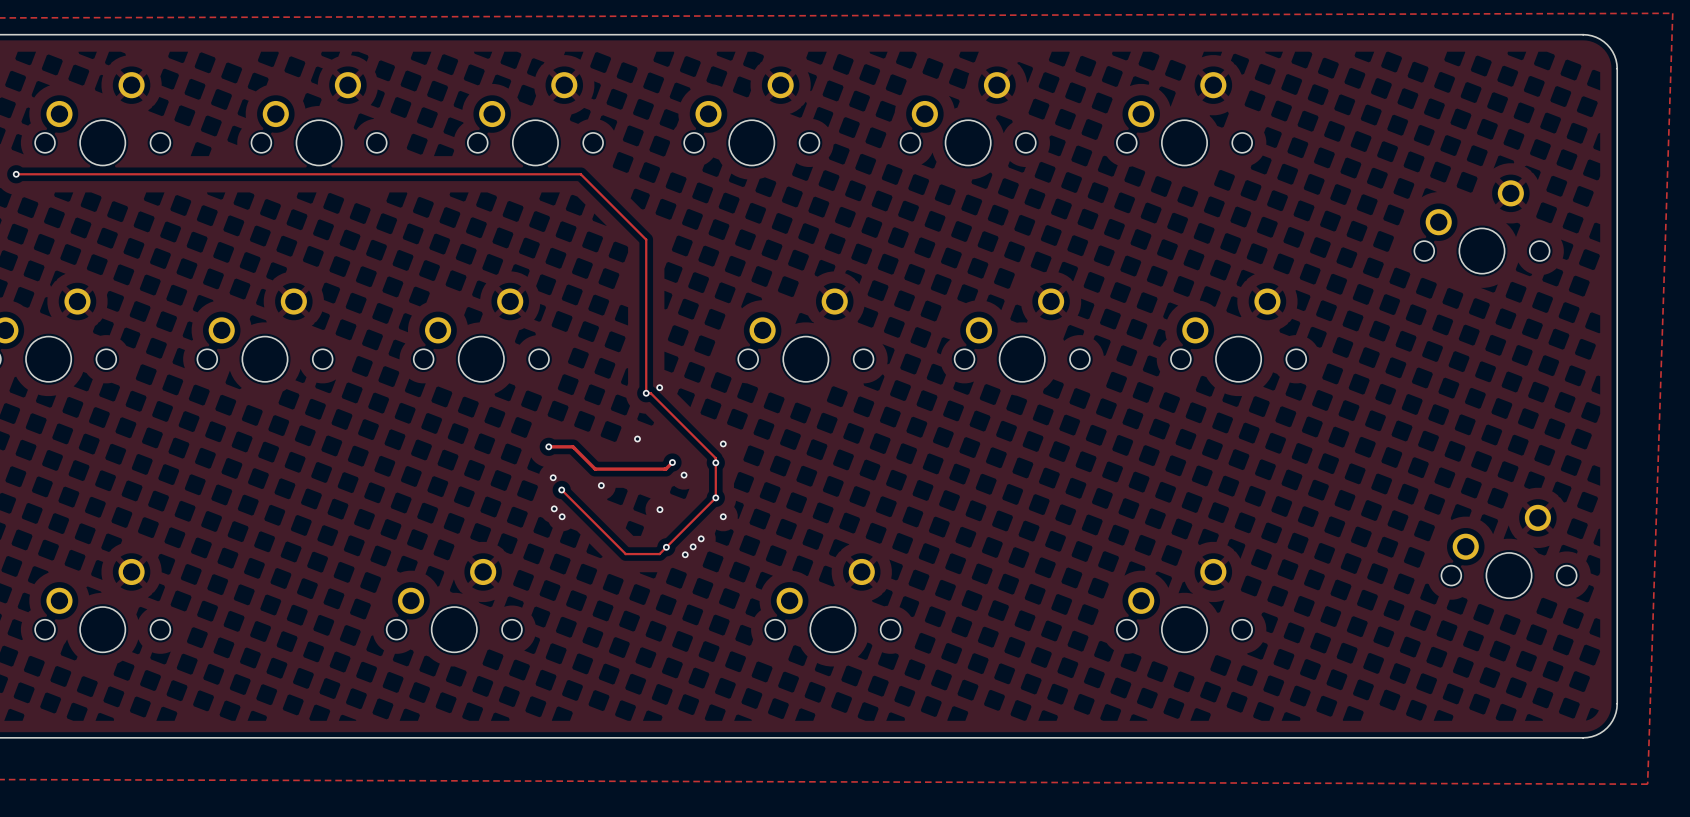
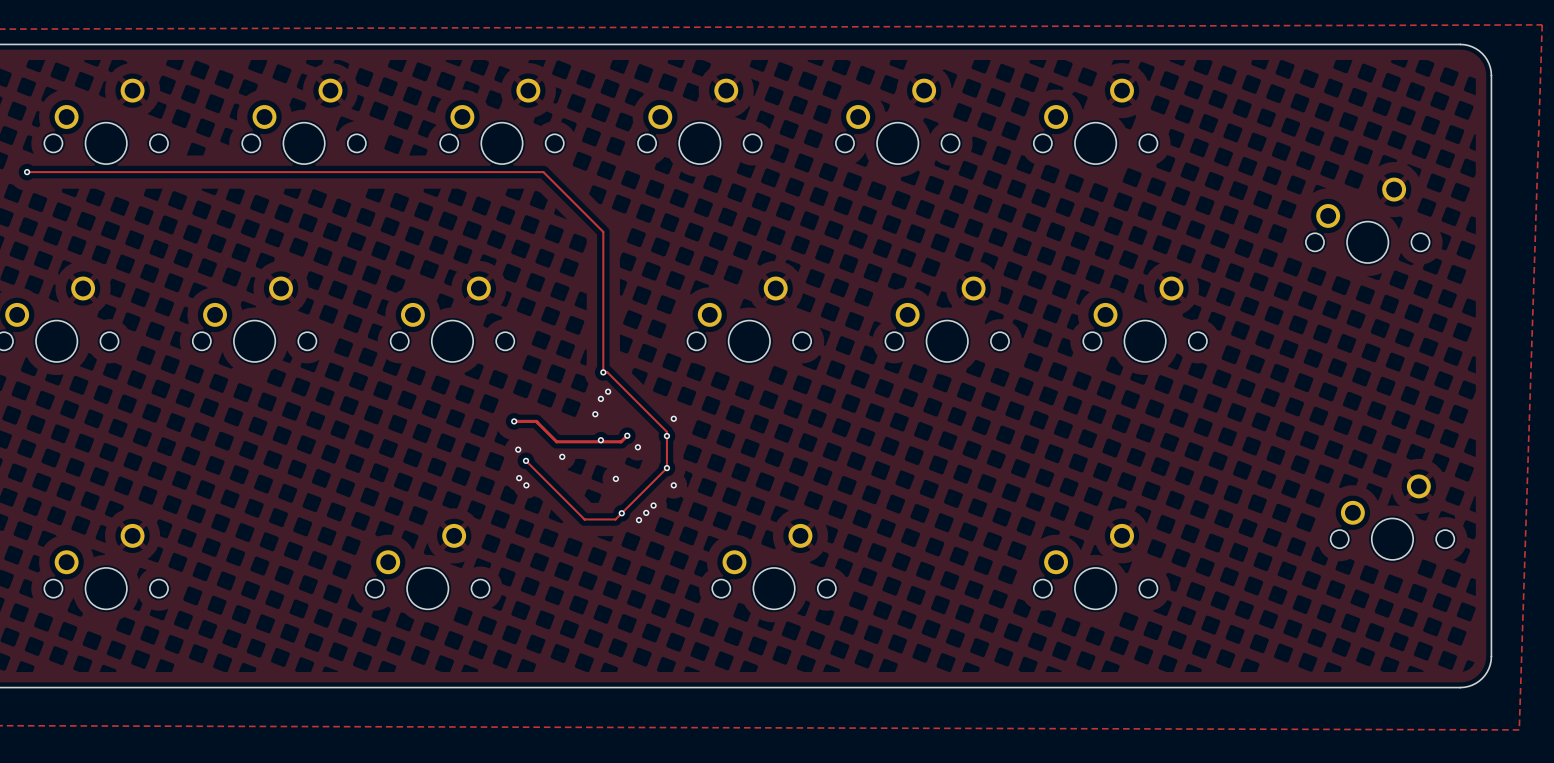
via: (659, 387) -> none
via: none -> (608, 391)
via: none -> (600, 398)
via: none -> (600, 440)

